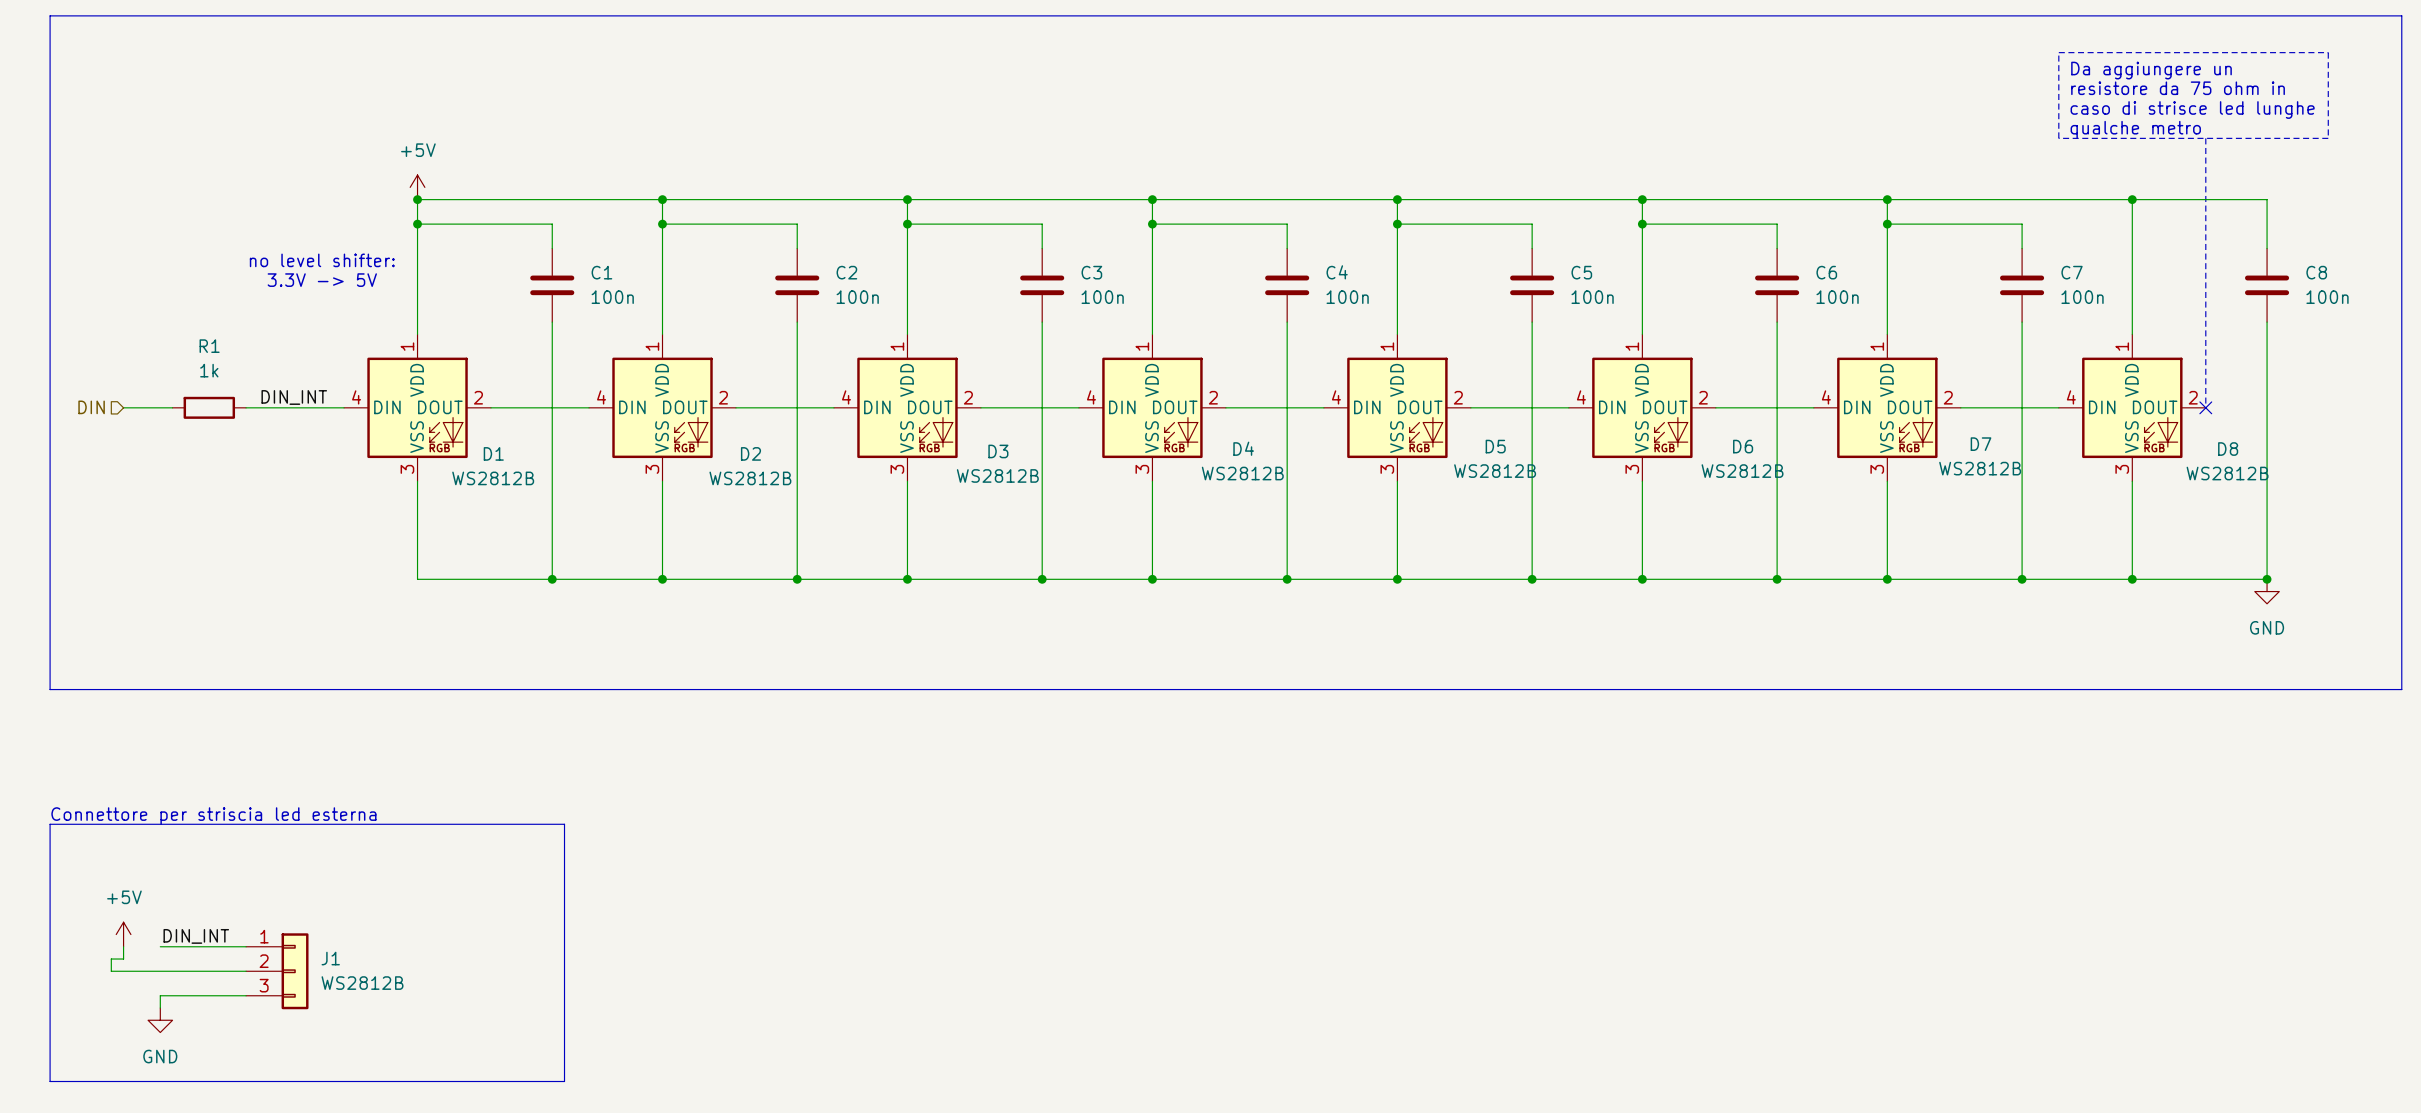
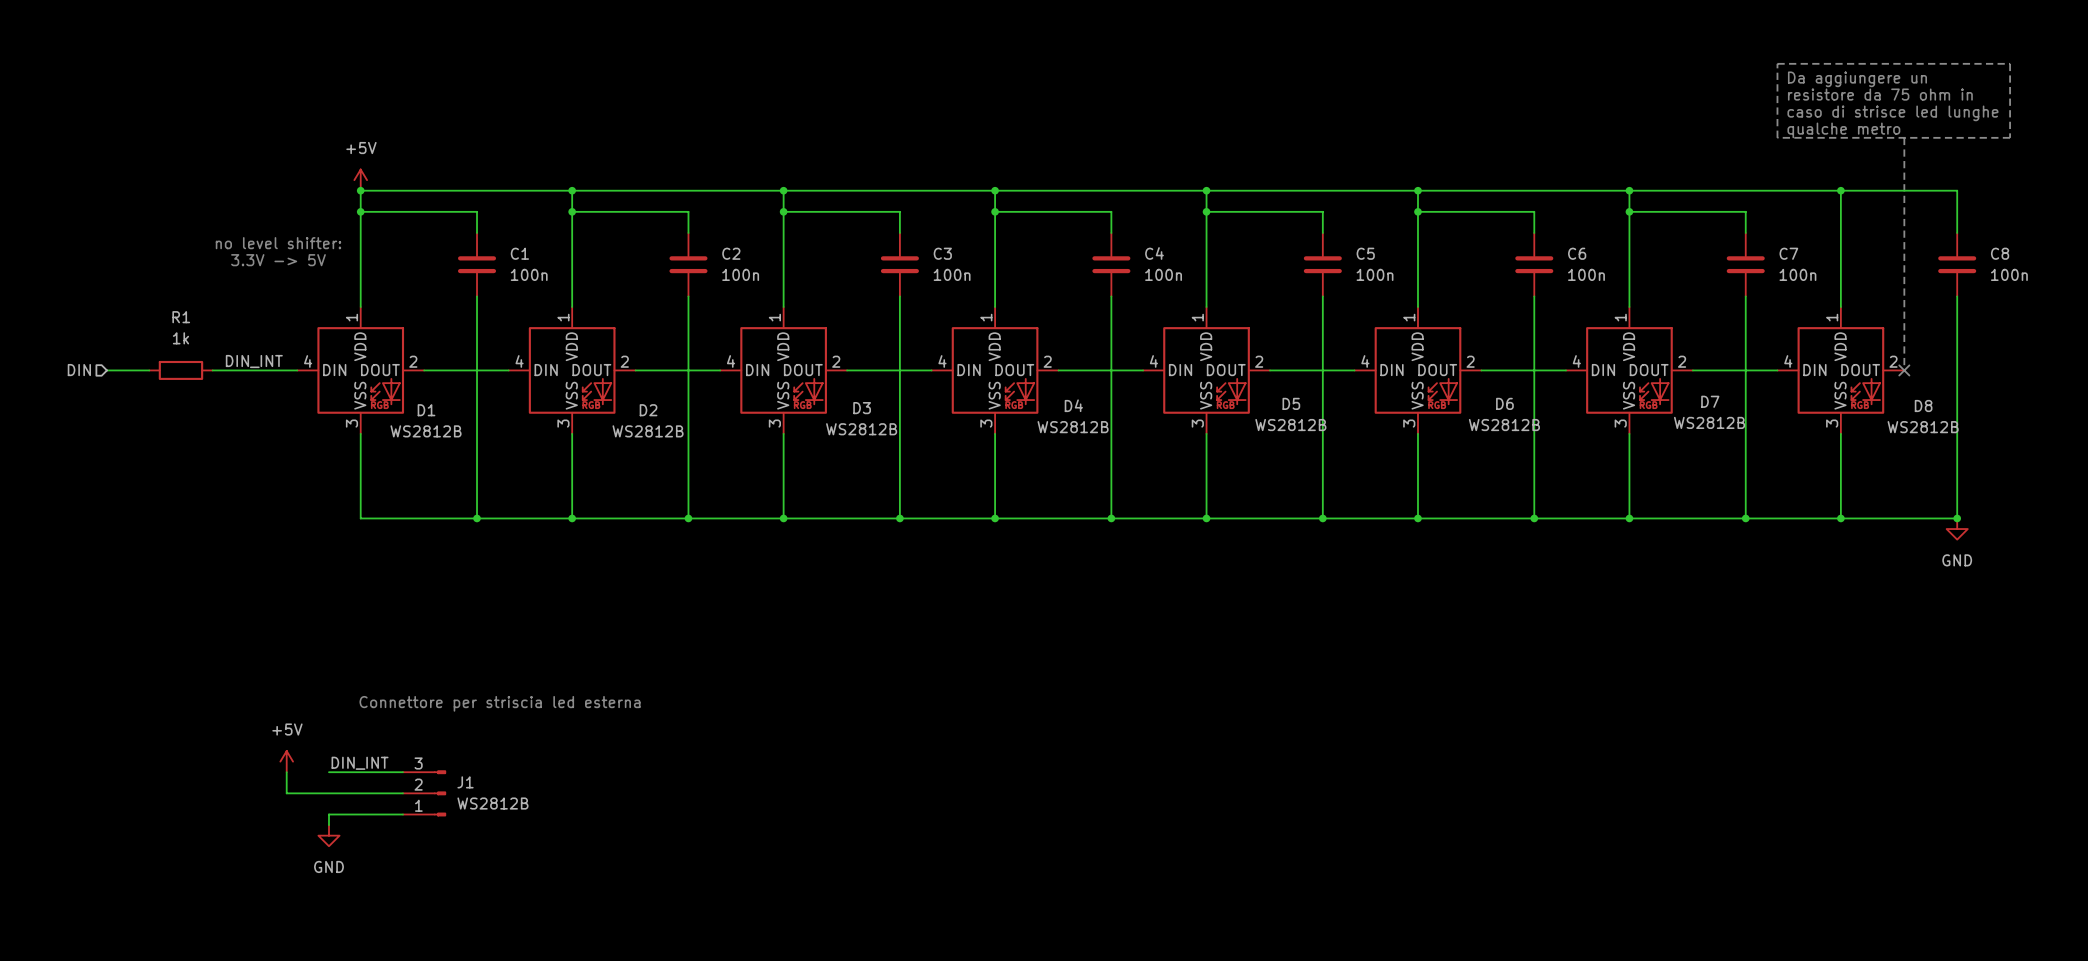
line: (50, 15) (2401, 15) (2401, 689) (50, 689) (50, 15) -> none
text: none -> Connettore per striscia led esterna (500, 703)
text: Connettore per striscia led esterna (213, 816) -> none
line: (50, 824) (50, 1081) (564, 1081) (564, 824) (50, 824) -> none
wire: none -> (286, 772) (286, 793) (403, 793)
J1 symbol: [246, 933, 309, 1010] -> [403, 770, 446, 817]
power symbol position: +5V (123, 934) -> +5V (286, 761)
label position: DIN_INT (196, 936) -> DIN_INT (360, 763)
wire: (123, 946) (123, 959) (111, 959) (111, 971) (246, 971) -> none
wire: (160, 946) (246, 946) -> (328, 772) (403, 772)
wire: (246, 995) (160, 995) (160, 1008) -> (403, 814) (328, 814) (328, 825)
power symbol position: GND (160, 1020) -> GND (328, 835)

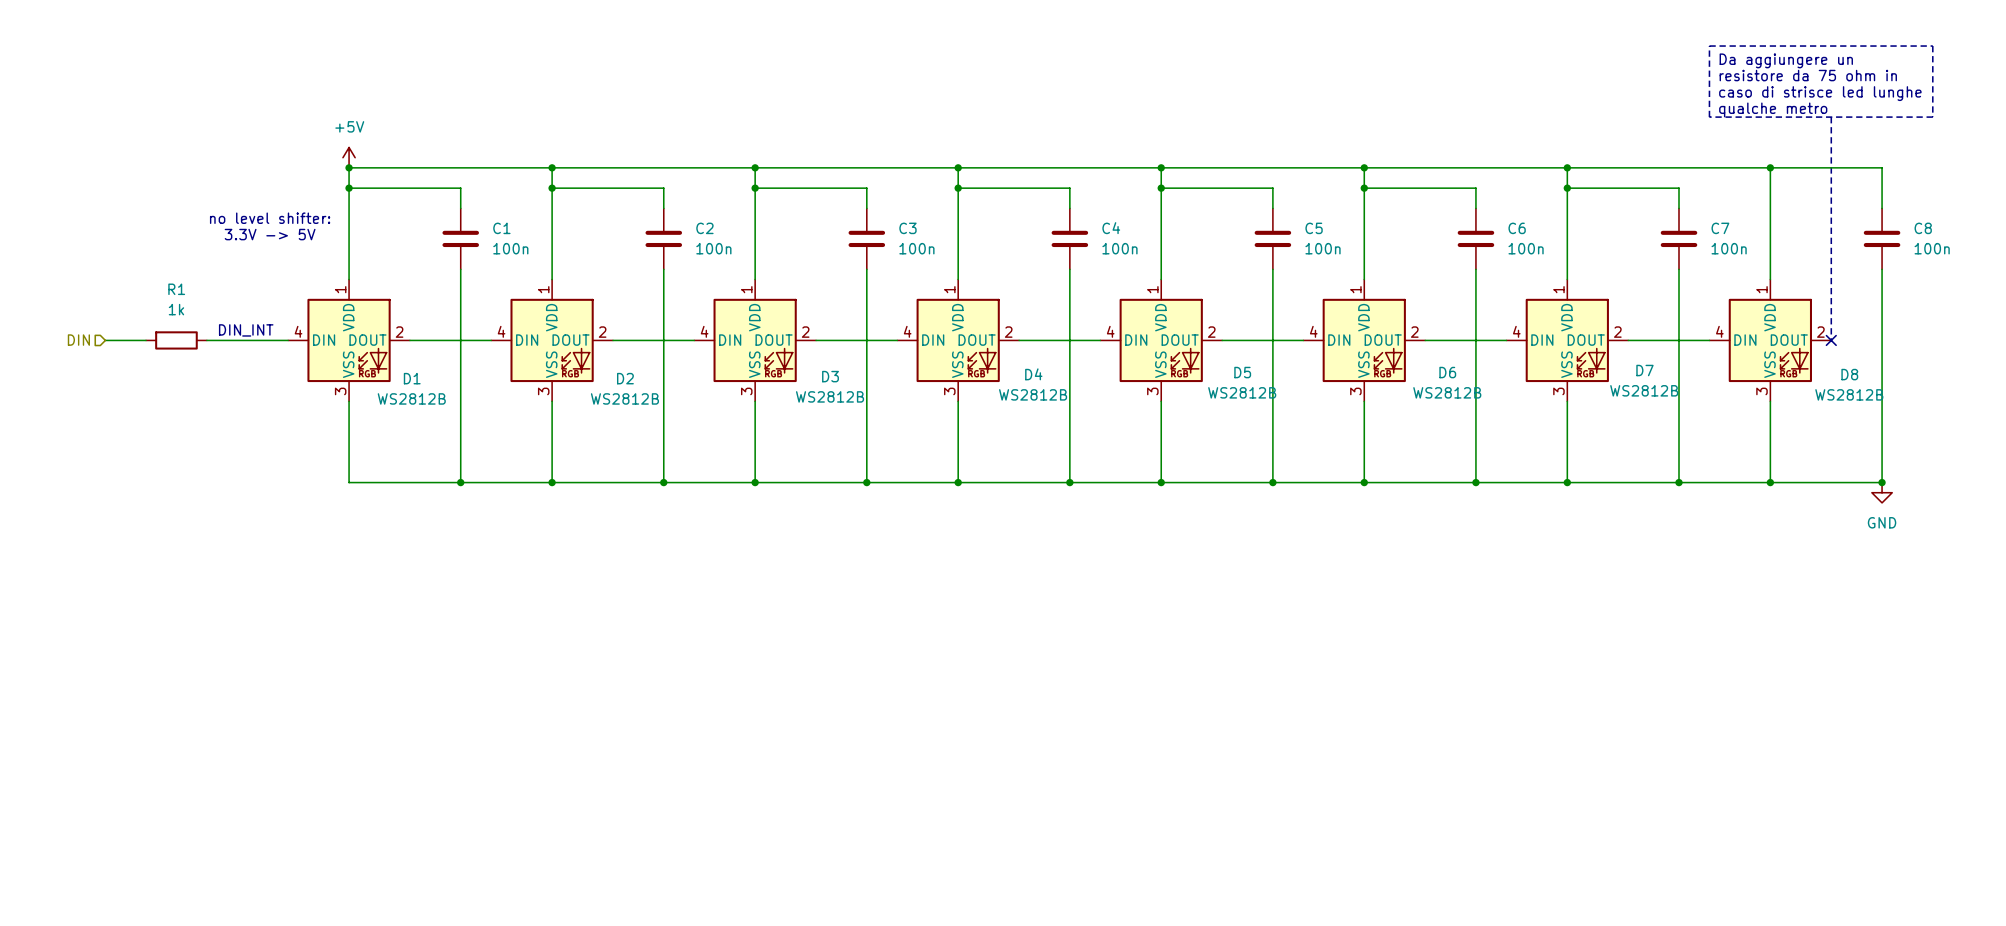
text: none -> DIN_INT (246, 330)
label: DIN_INT (254, 361) -> none
text: Connettore per striscia led esterna (500, 703) -> none
power symbol: +5V (286, 761) -> none
label: DIN_INT (360, 763) -> none
wire: (286, 772) (286, 793) (403, 793) -> none
wire: (328, 772) (403, 772) -> none
J1: WS2812B (424, 793) -> none
wire: (403, 814) (328, 814) (328, 825) -> none
power symbol: GND (328, 835) -> none

